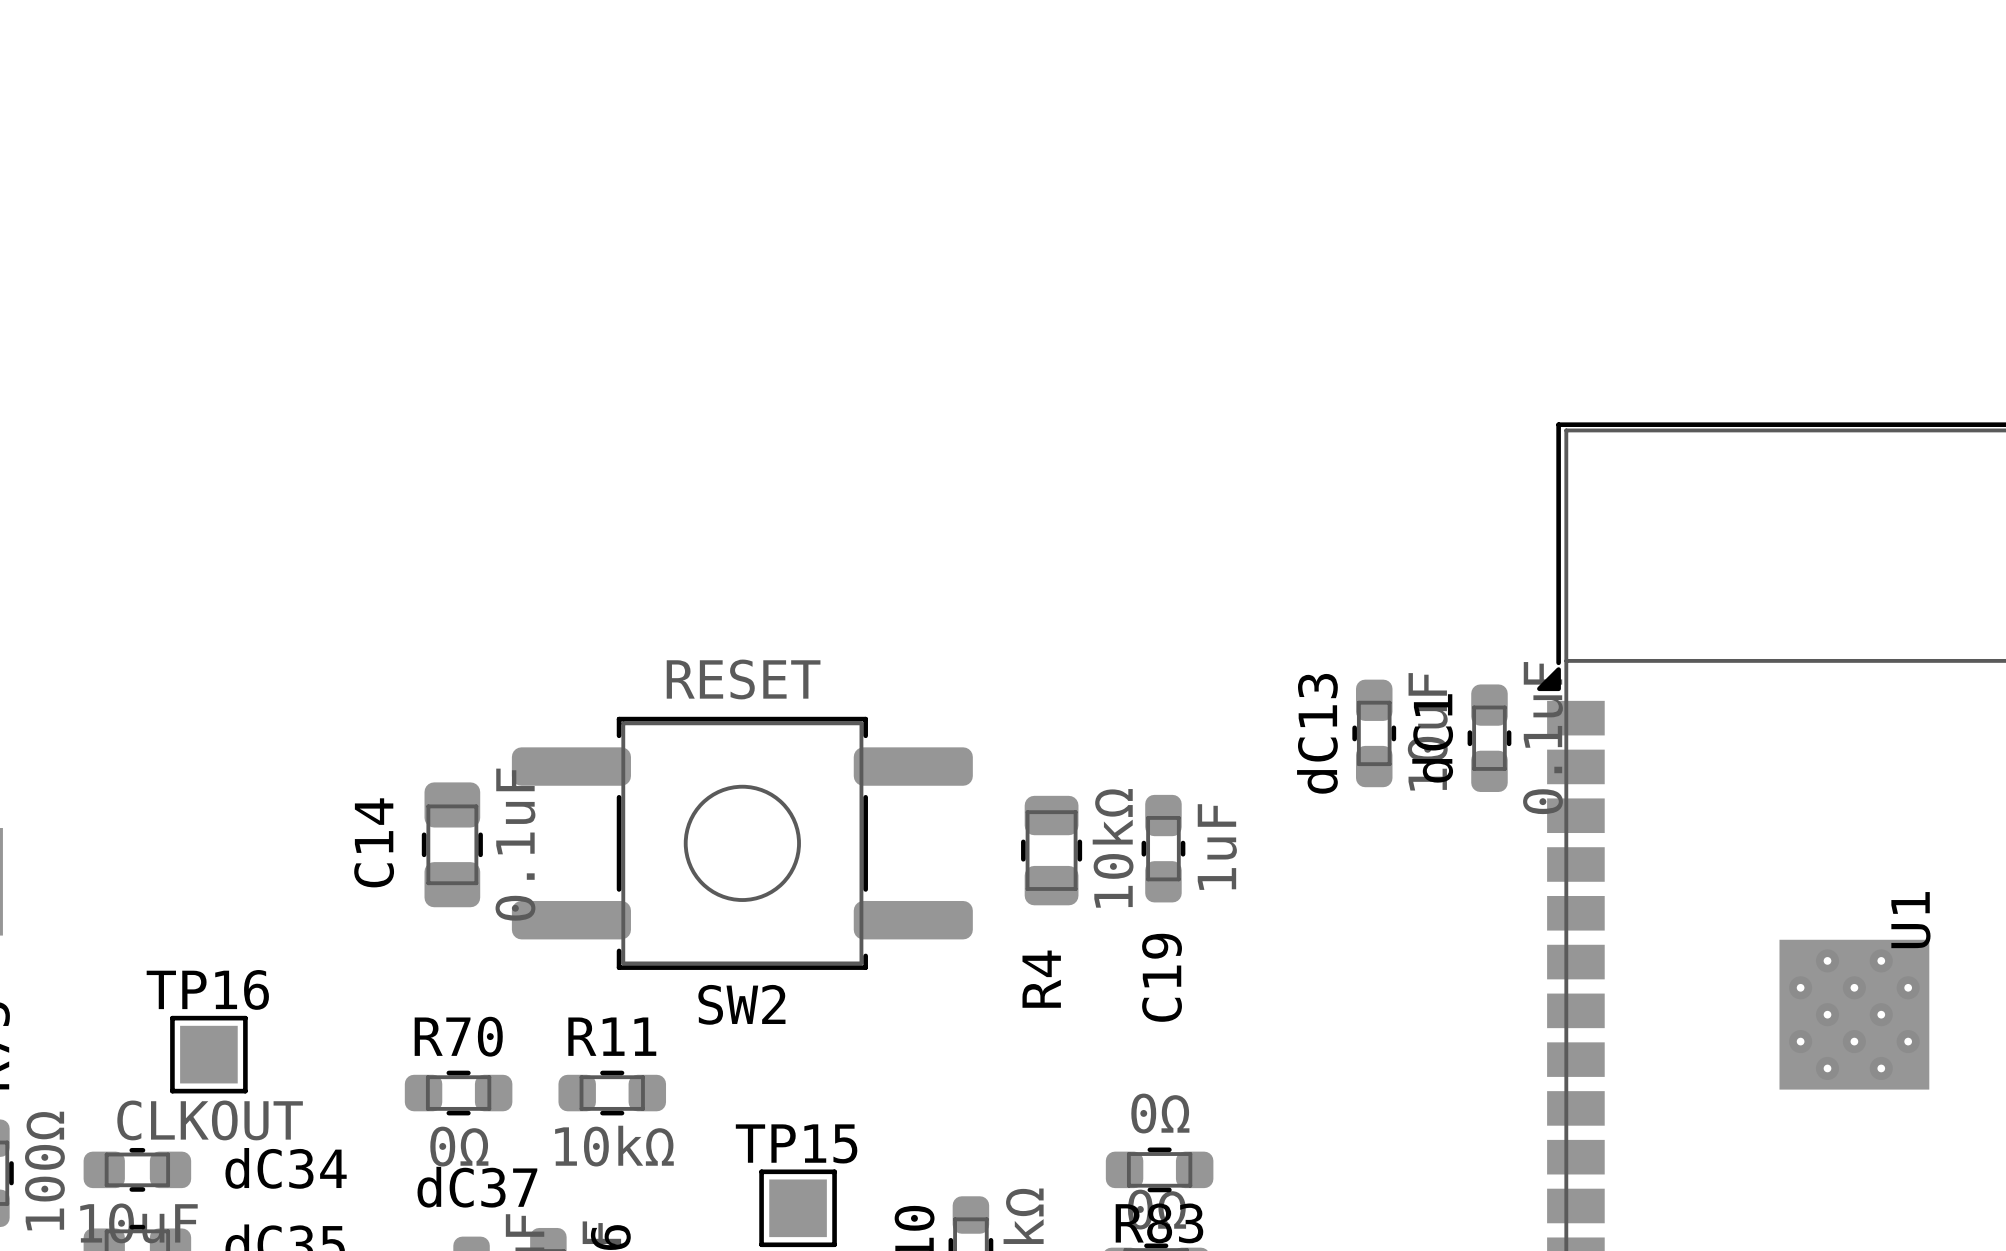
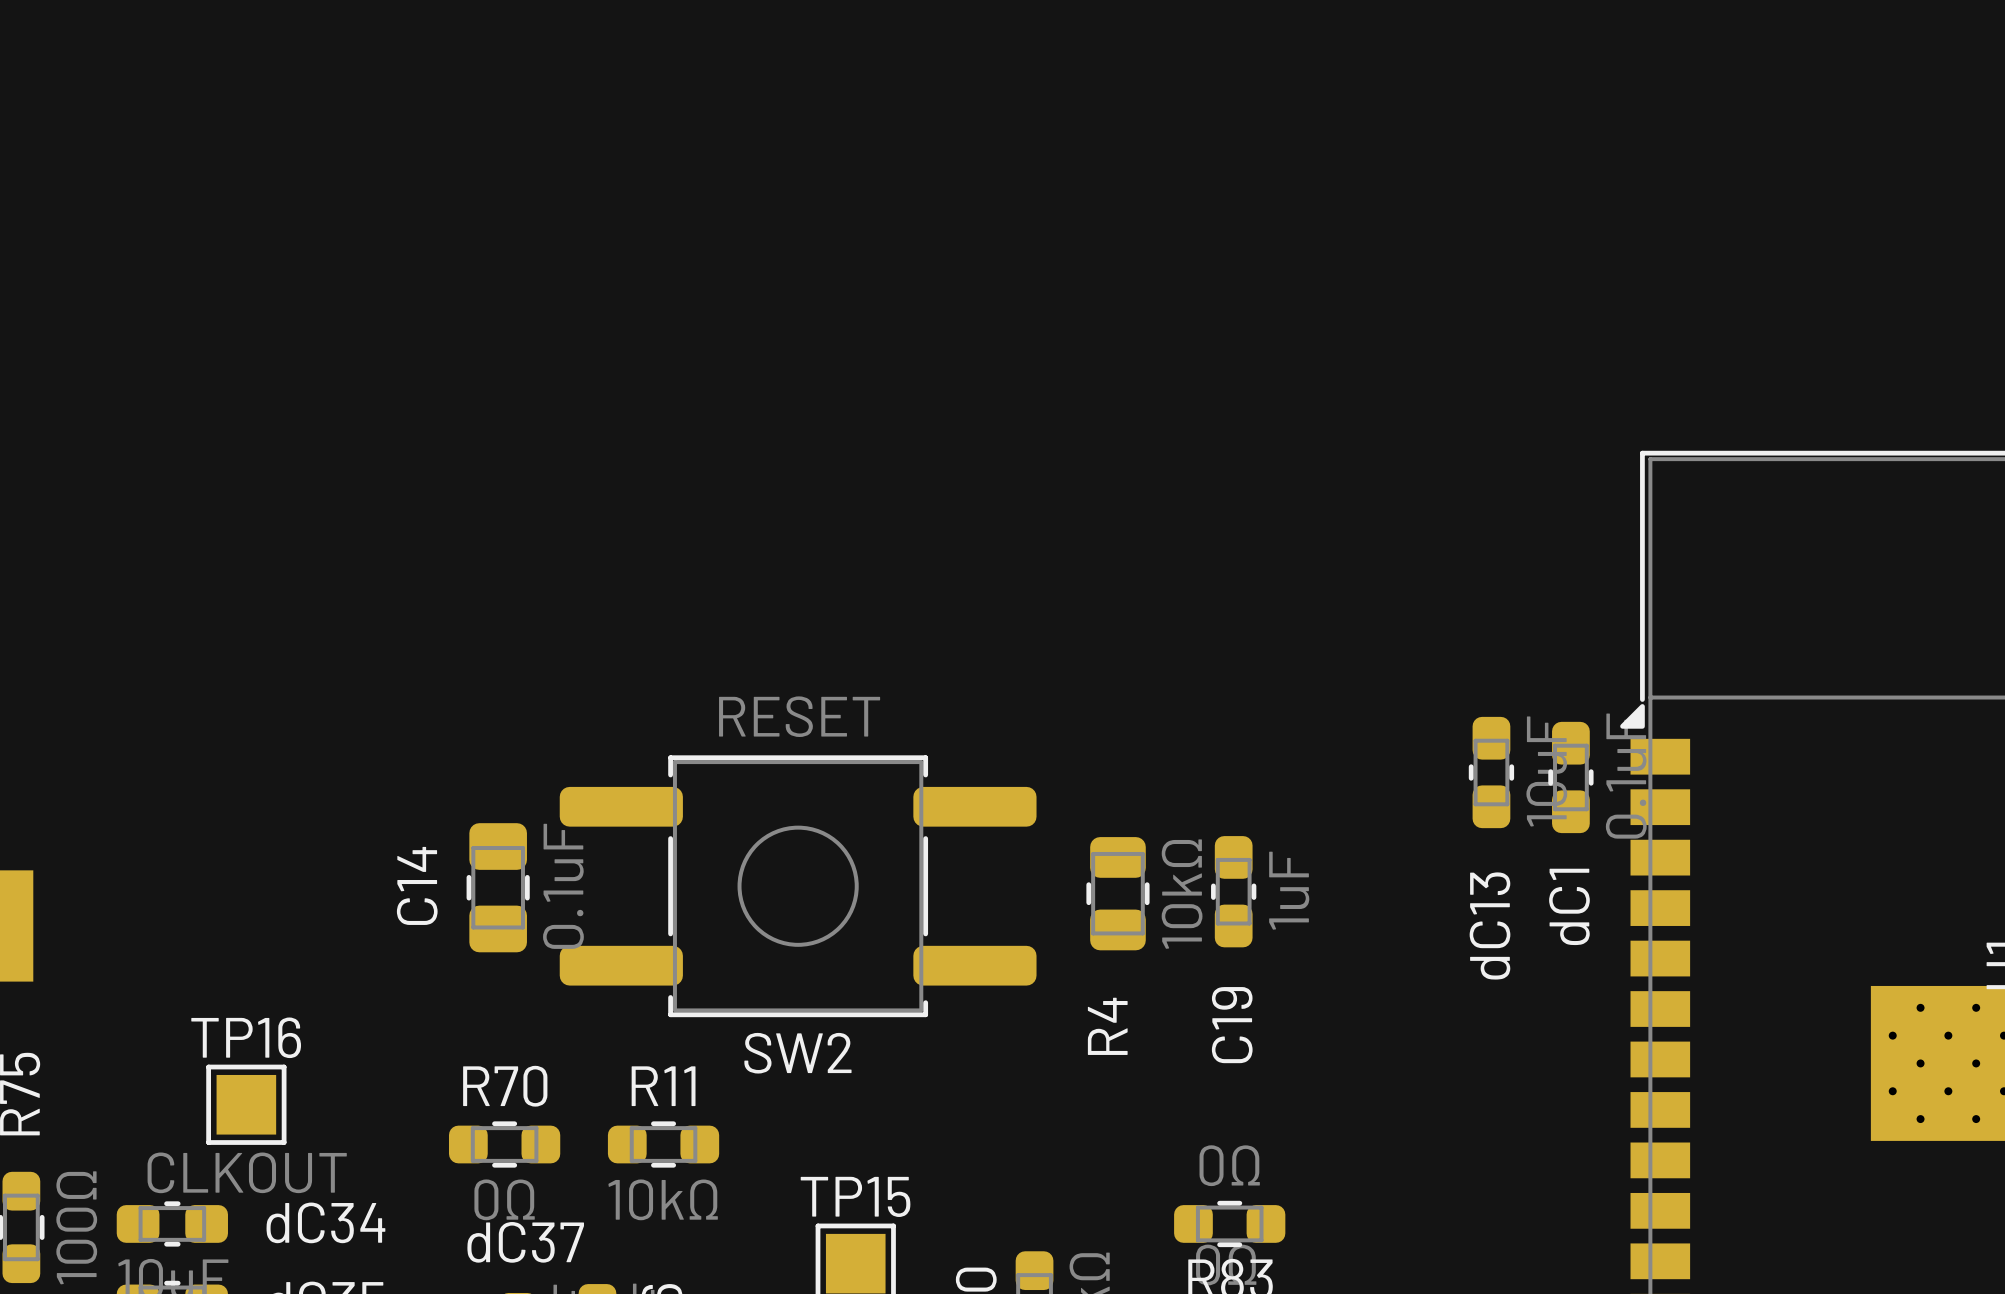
dC13 name position: dC13 (1317, 733) -> dC13 (1489, 925)
dC13 position: (1374, 733) -> (1491, 772)
dC1 name position: dC1 (1432, 738) -> dC1 (1569, 906)

